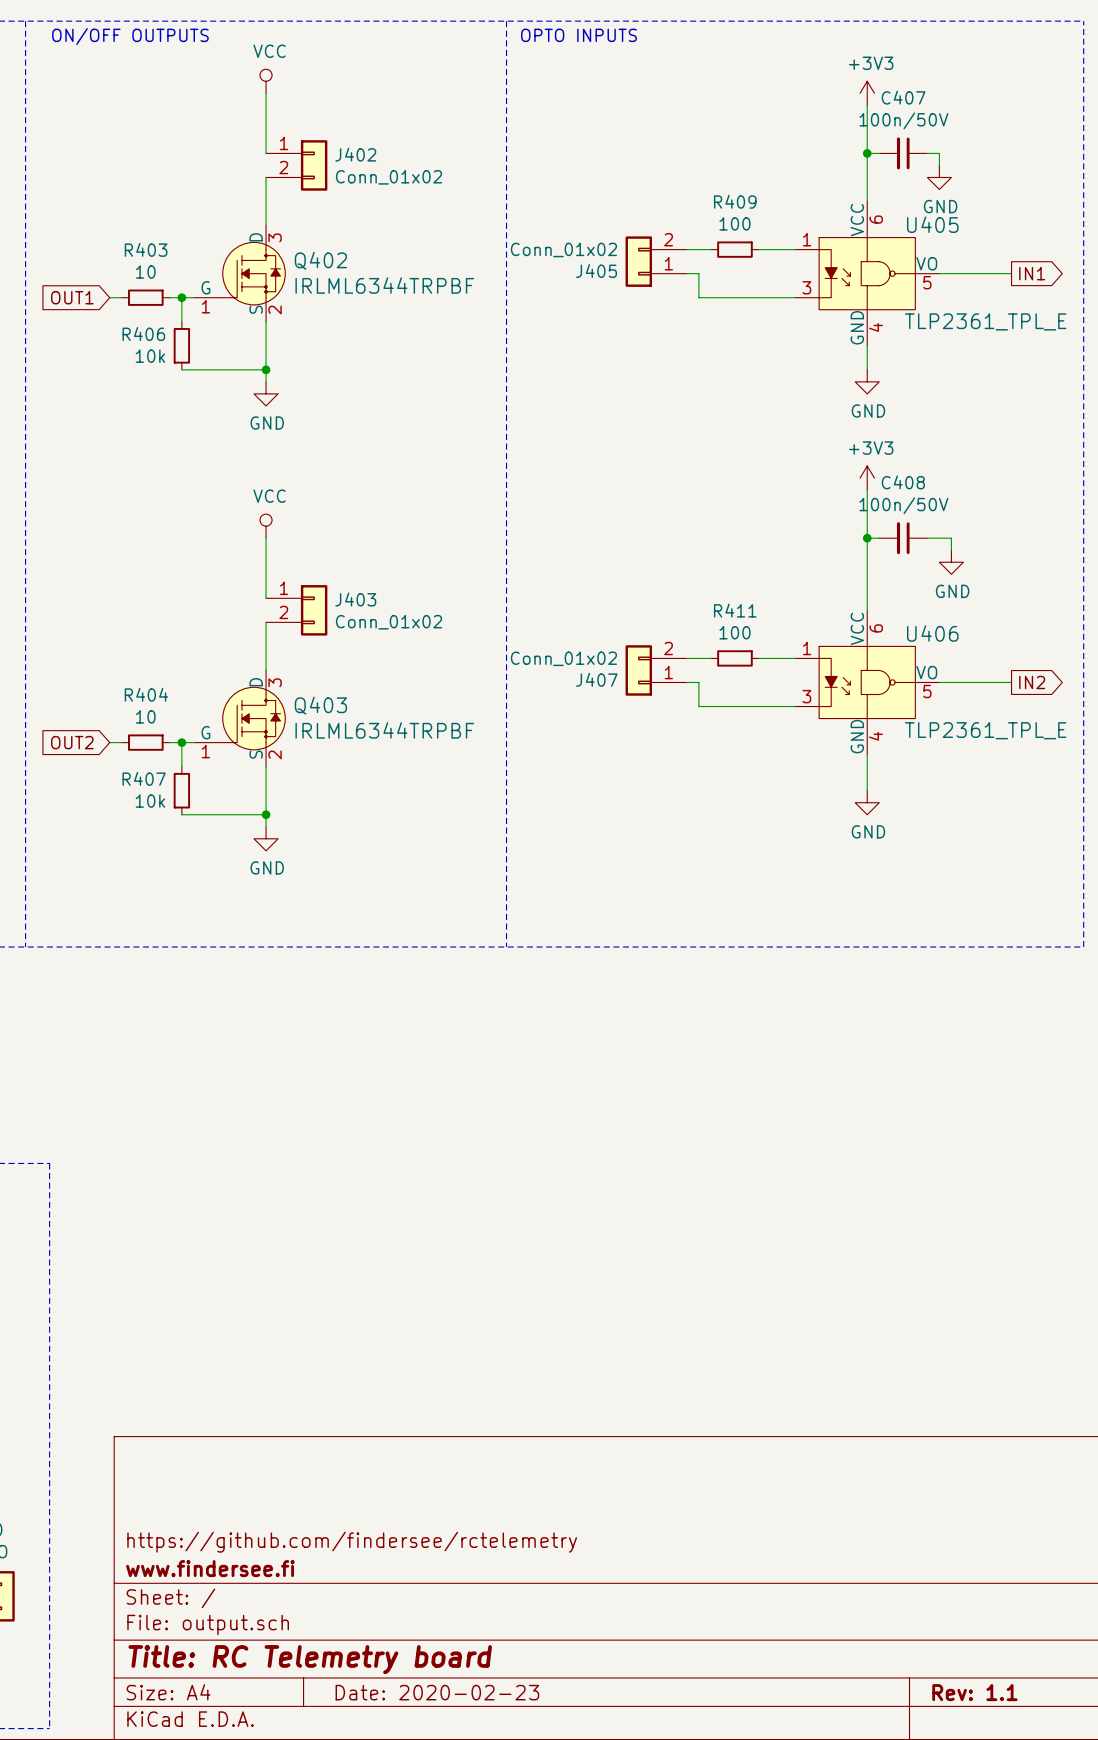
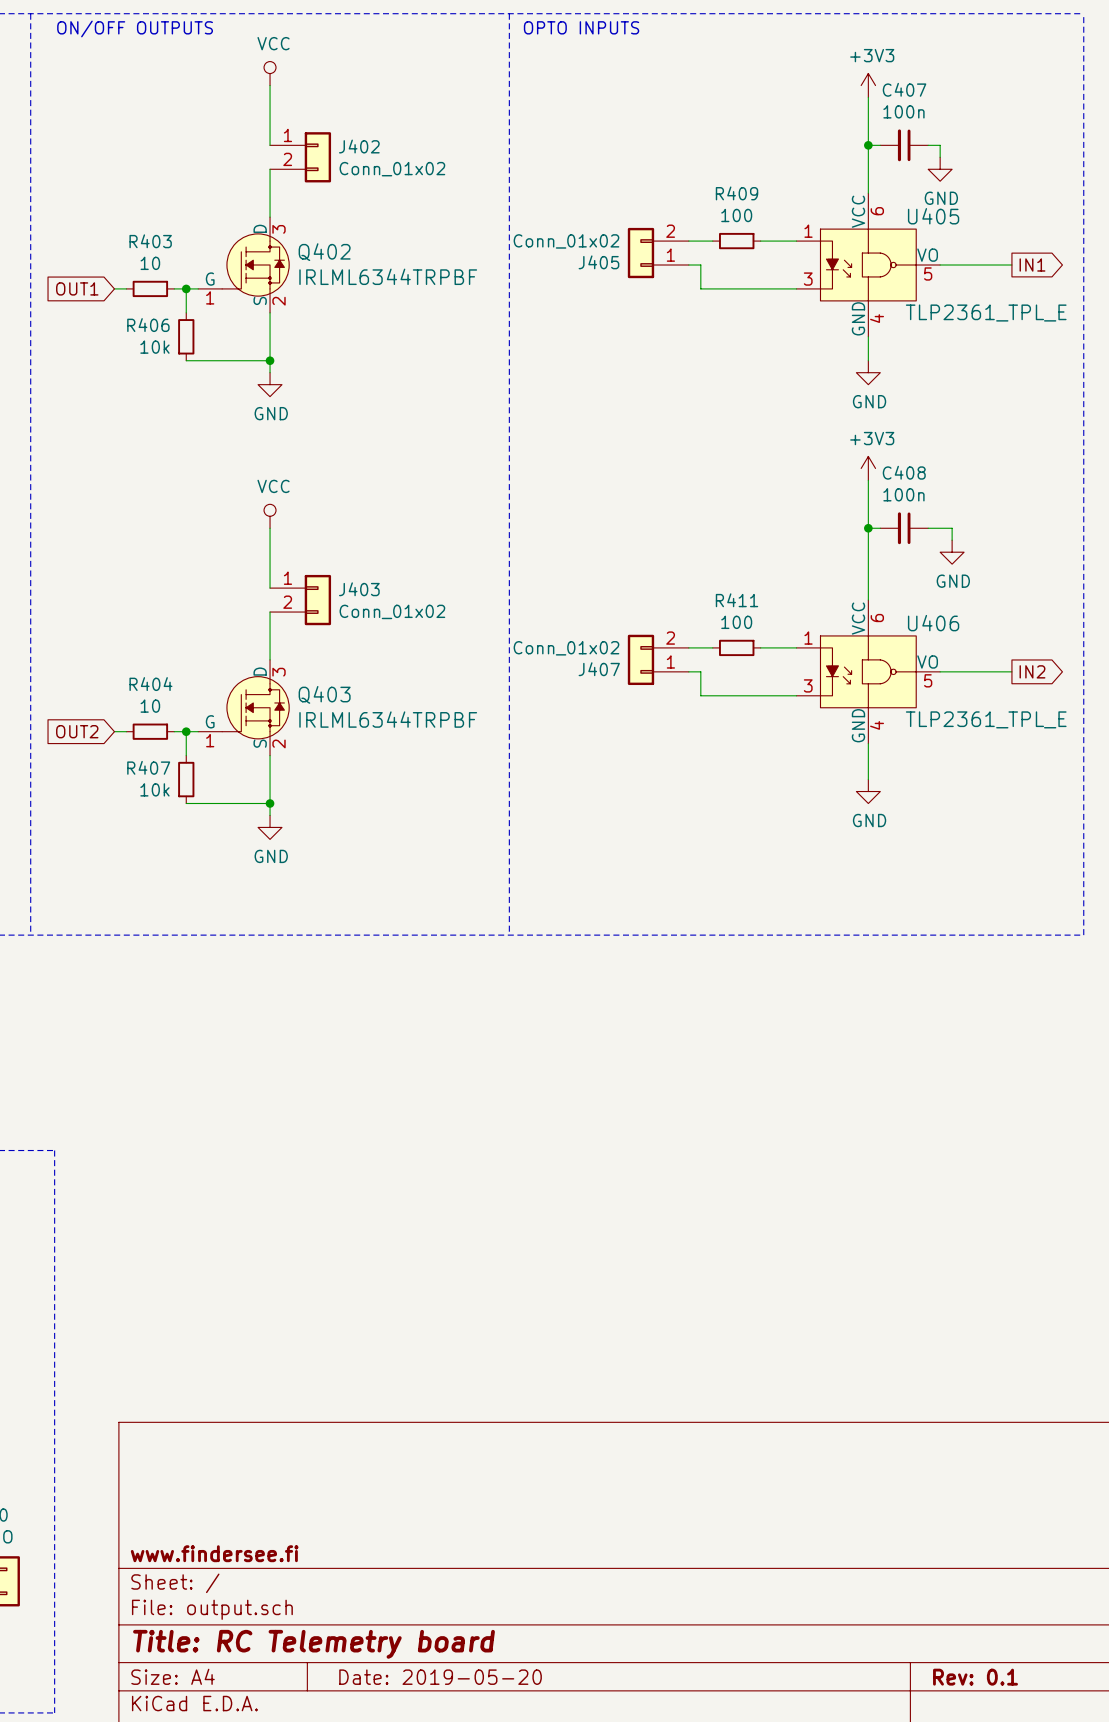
C407 value: 100n/50V (903, 120) -> 100n (903, 111)
C408 value: 100n/50V (903, 505) -> 100n (903, 494)
title block: https://github.com/findersee/rctelemetry (352, 1542) -> none
title block: Date: 2020-02-23 (437, 1692) -> Date: 2019-05-20 (440, 1677)
title block: Rev: 1.1 (974, 1692) -> Rev: 0.1 (975, 1677)

